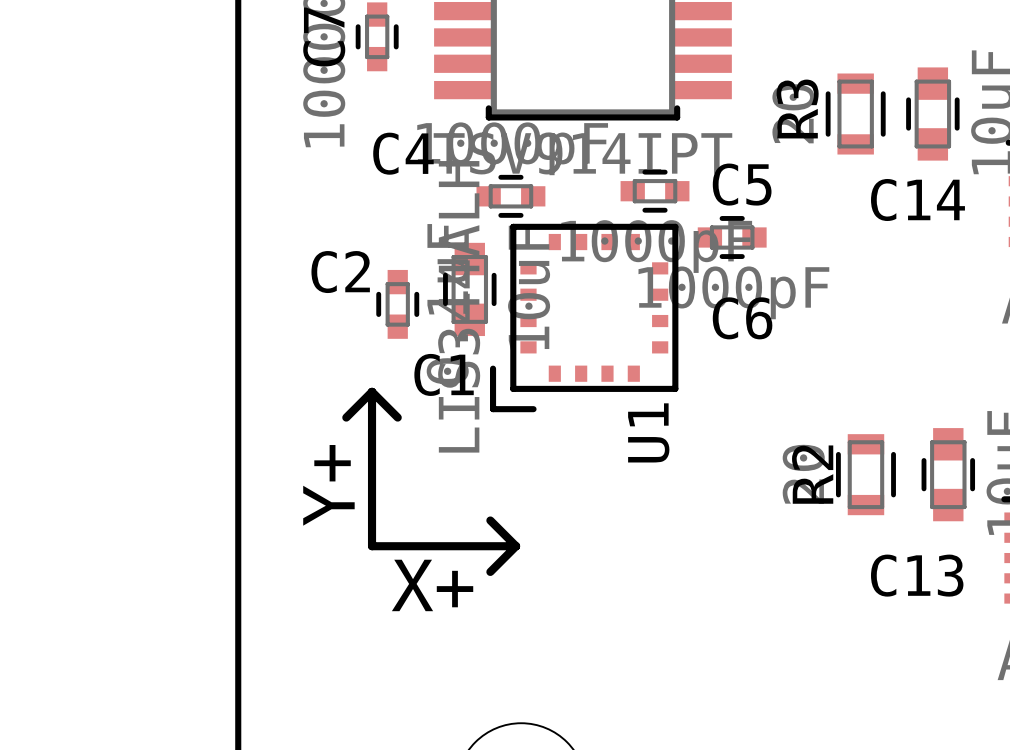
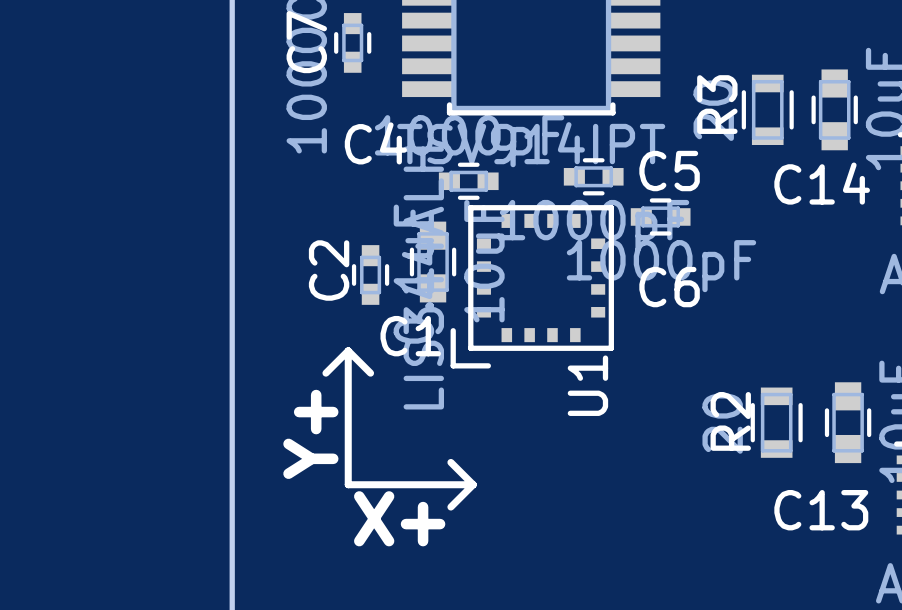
C2 name rotation: 0° (340, 272) -> 90° counterclockwise (329, 270)

